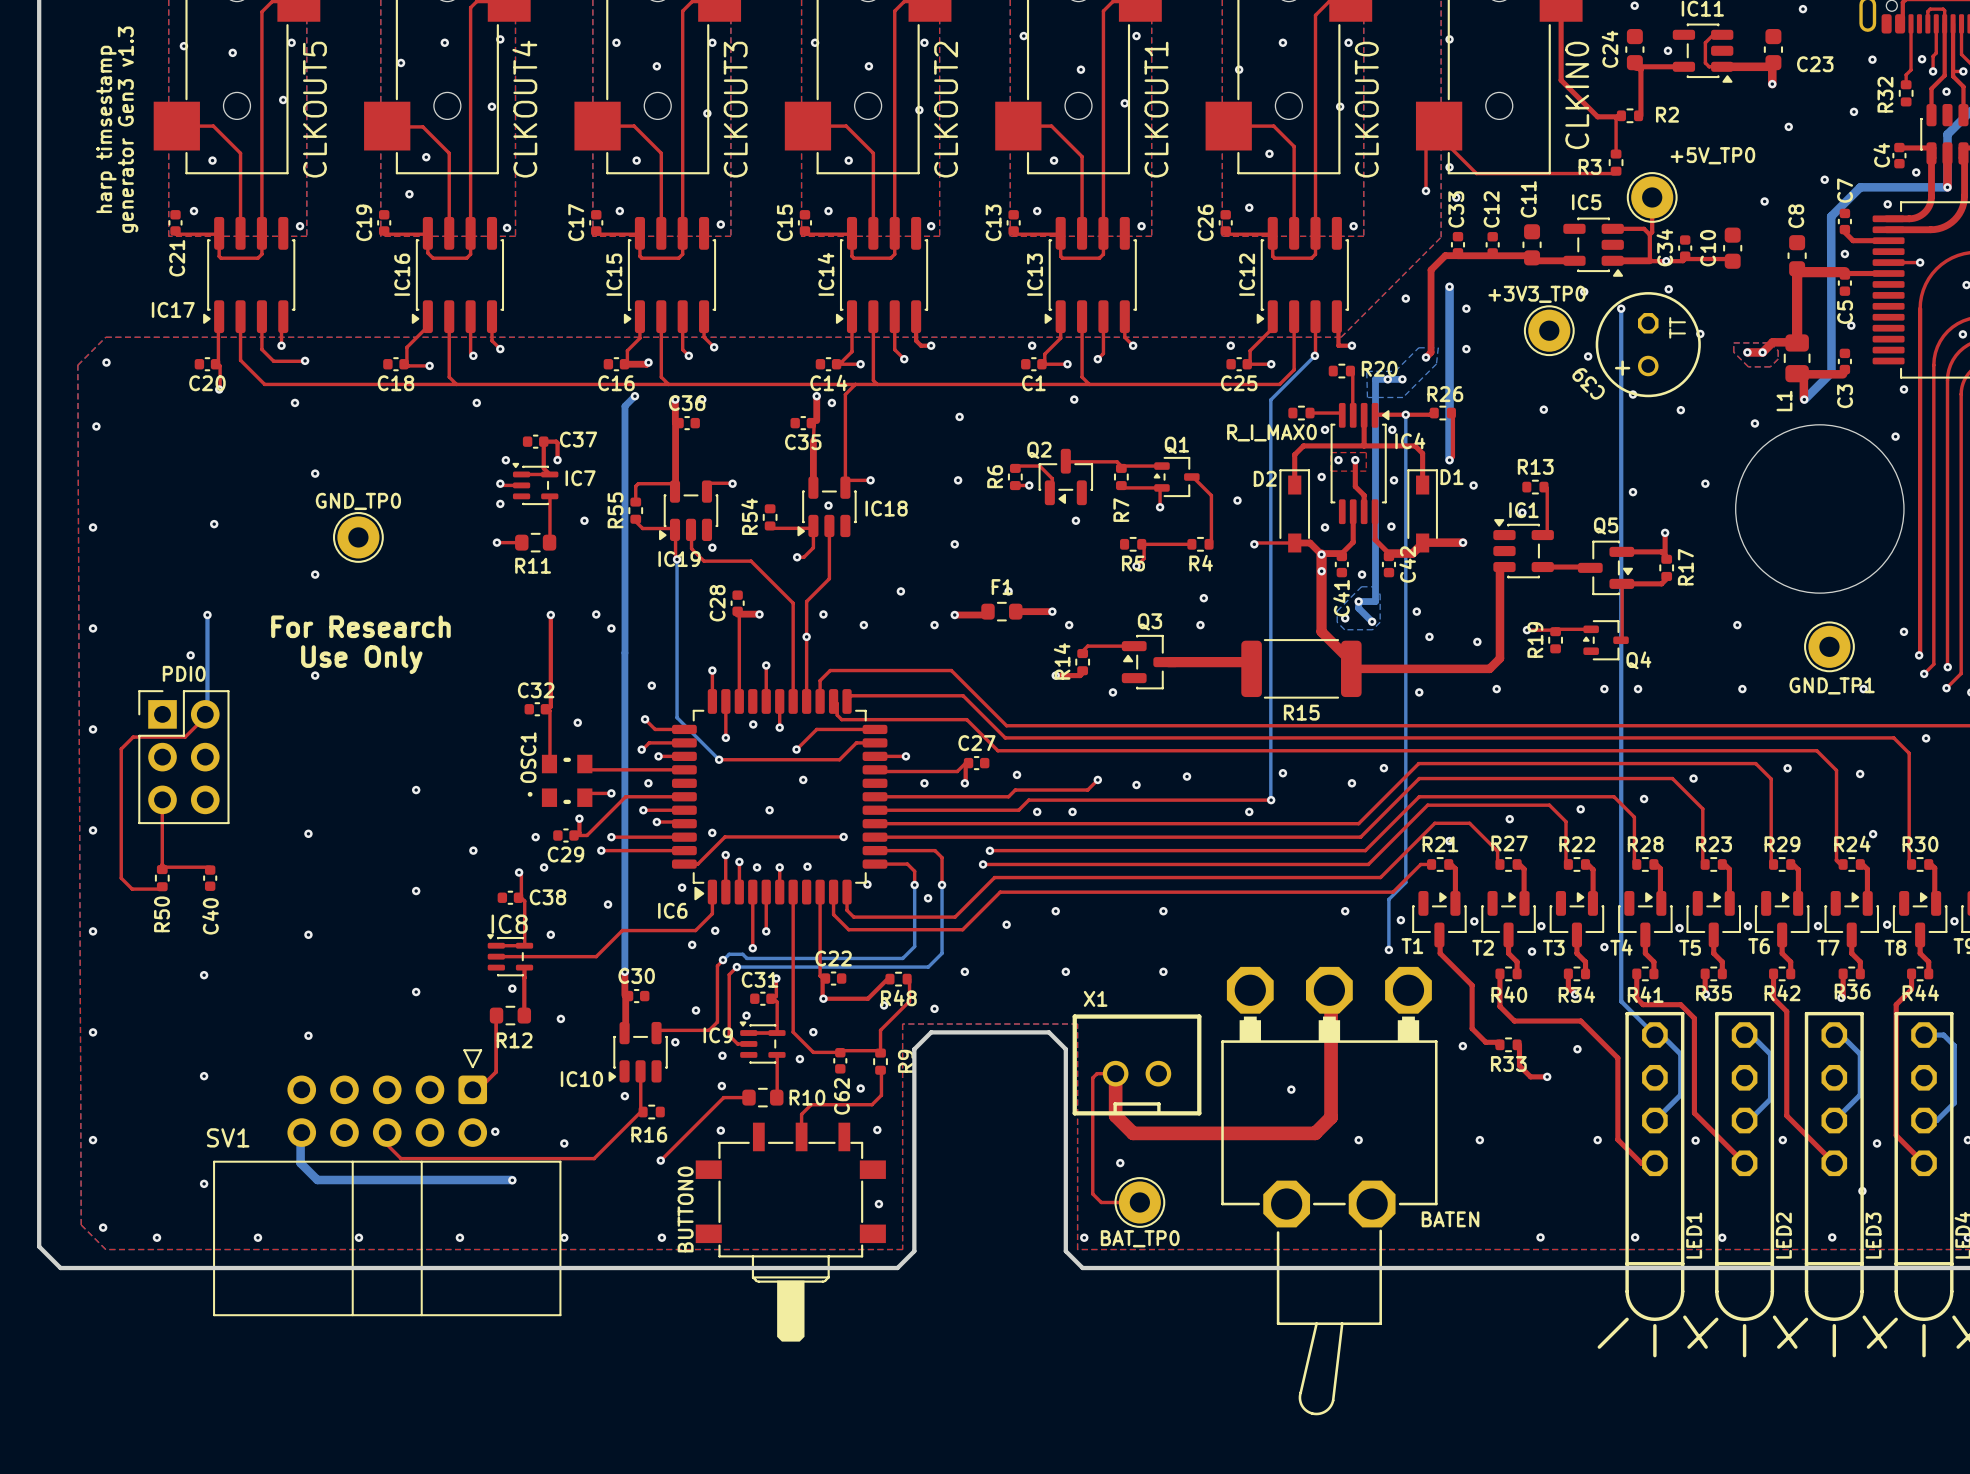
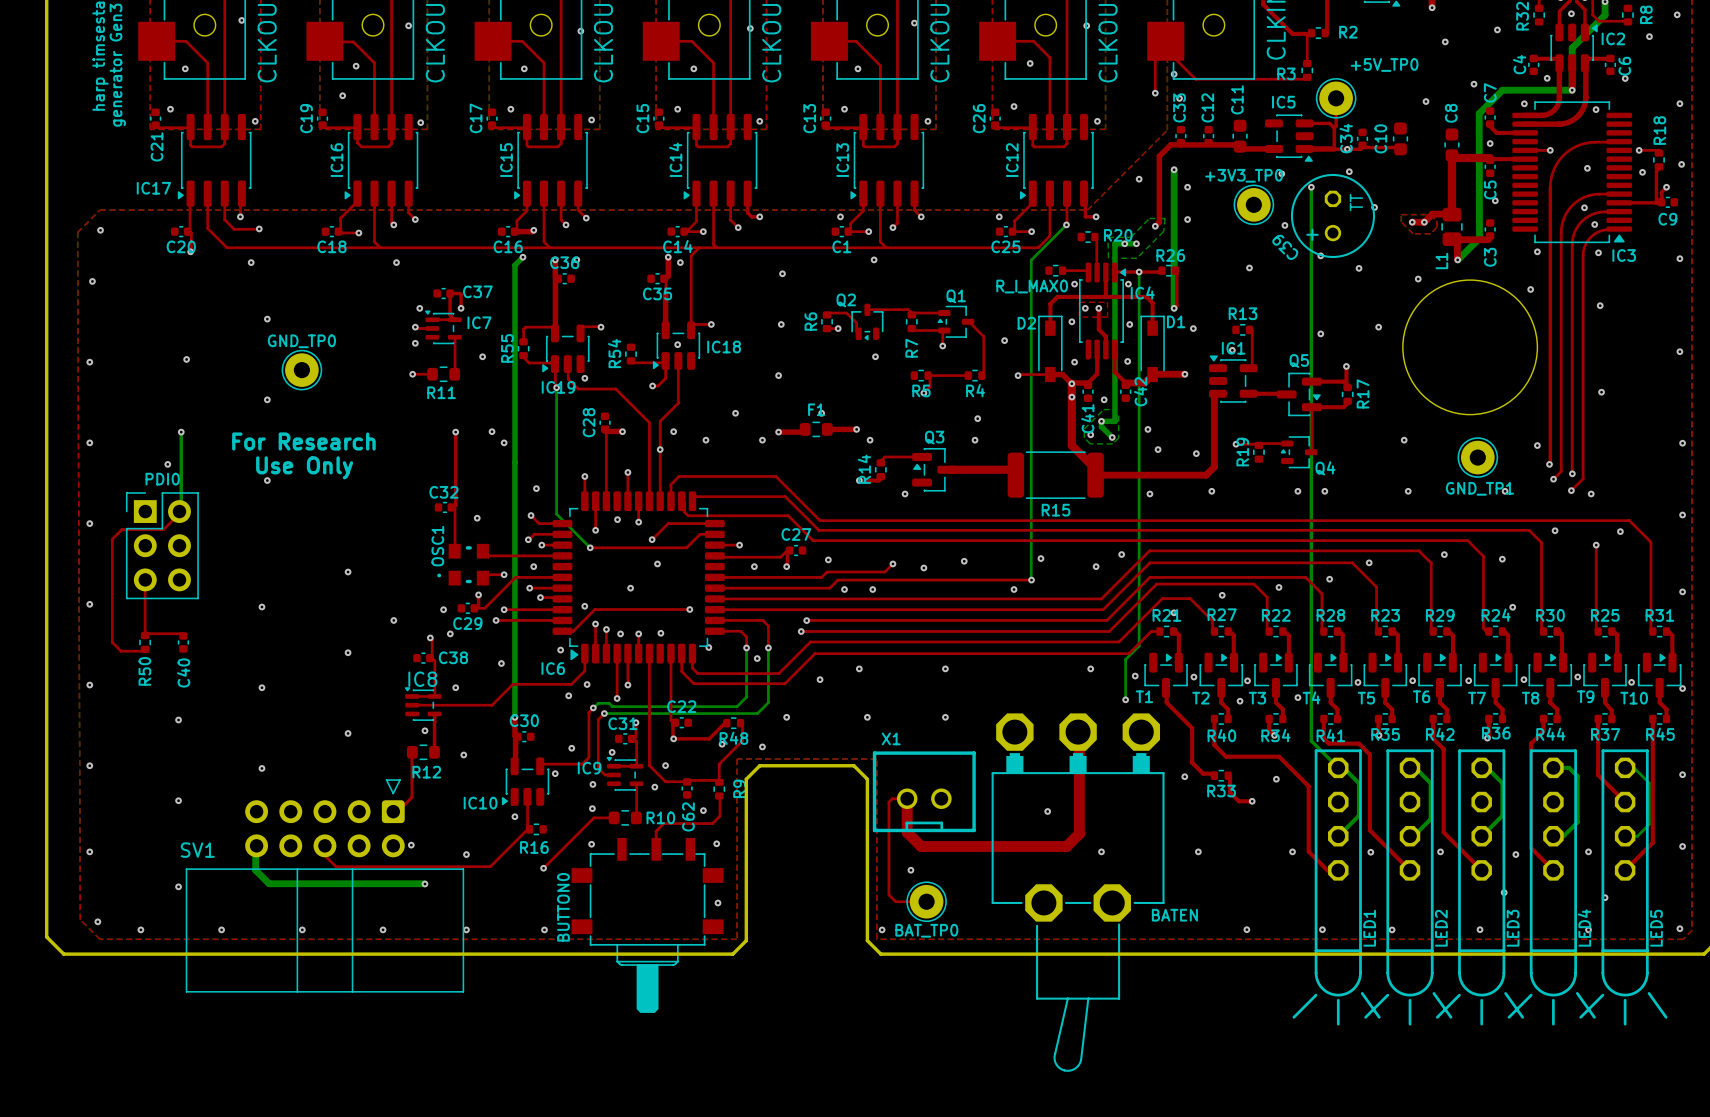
Q2 footprint: [1038, 448, 1094, 506] -> [851, 303, 884, 341]

